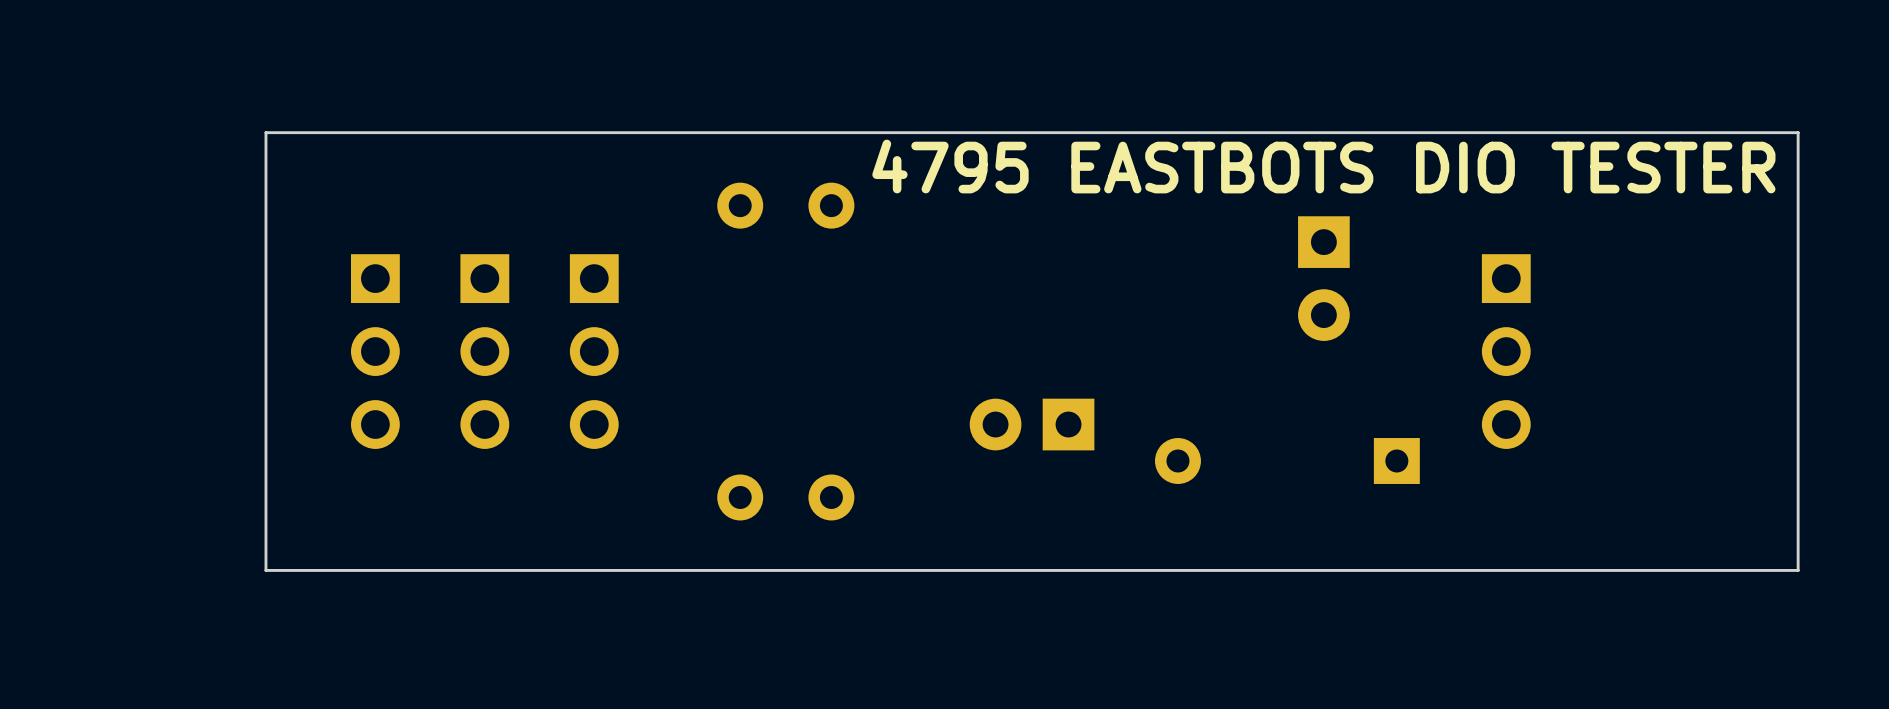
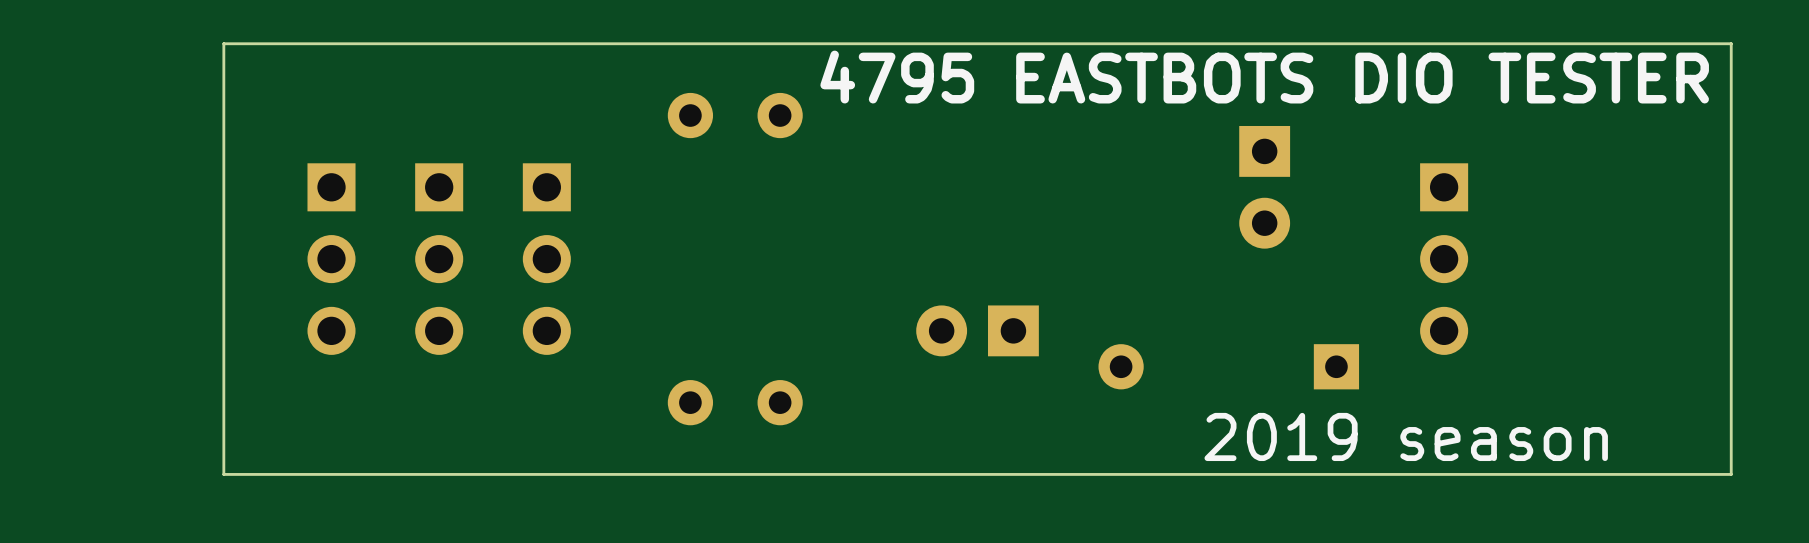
text: none -> 2019 season (1406, 436)

